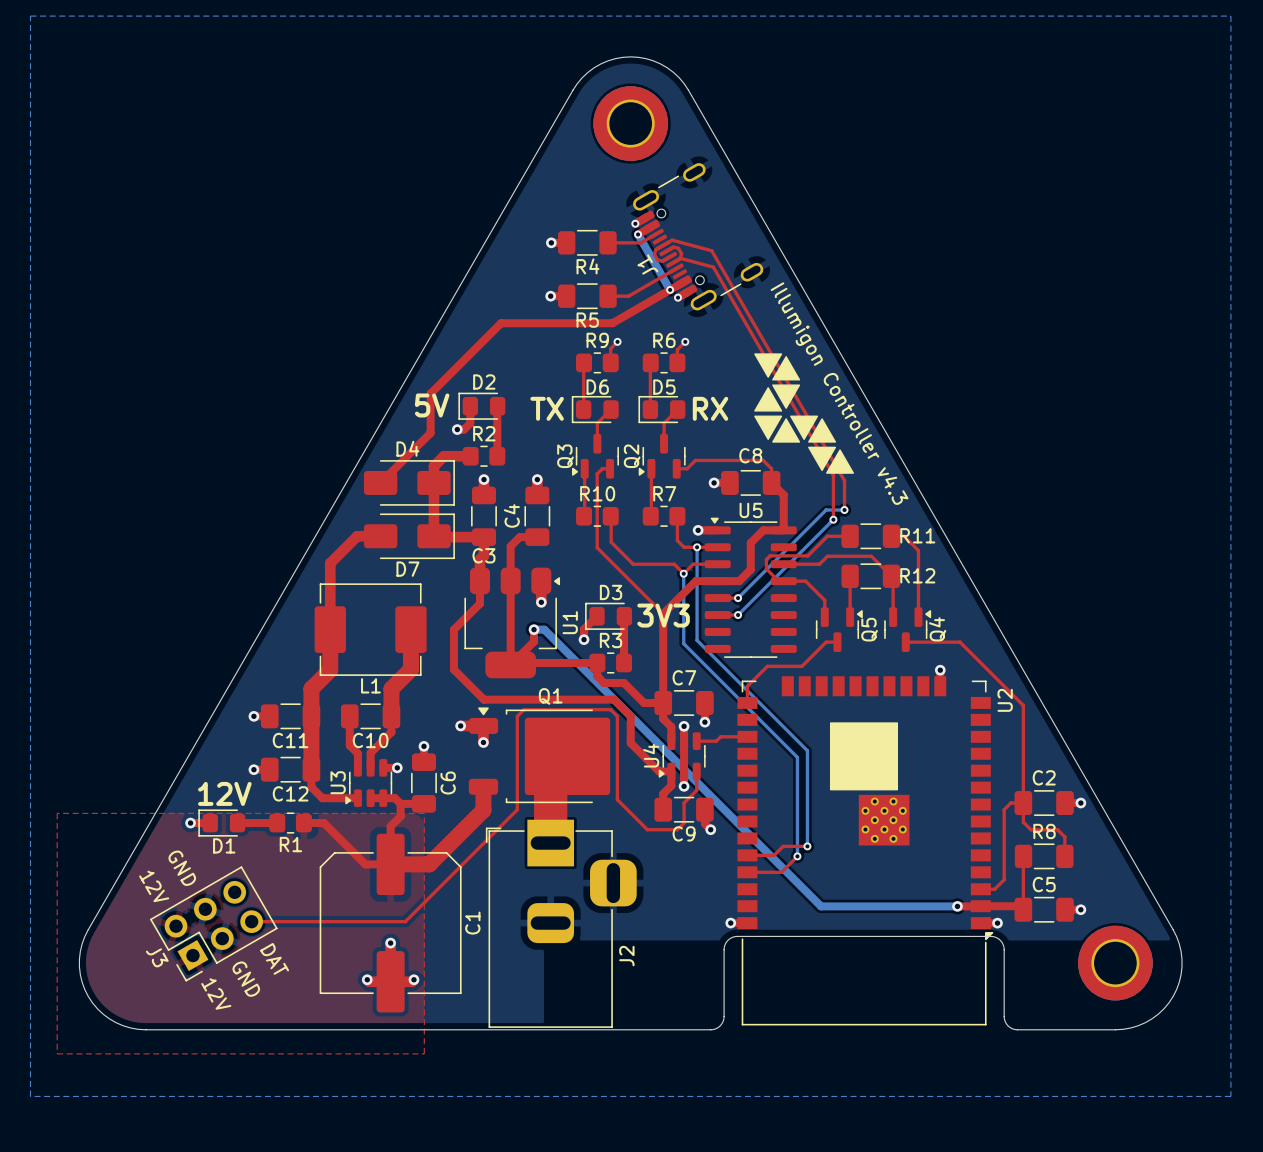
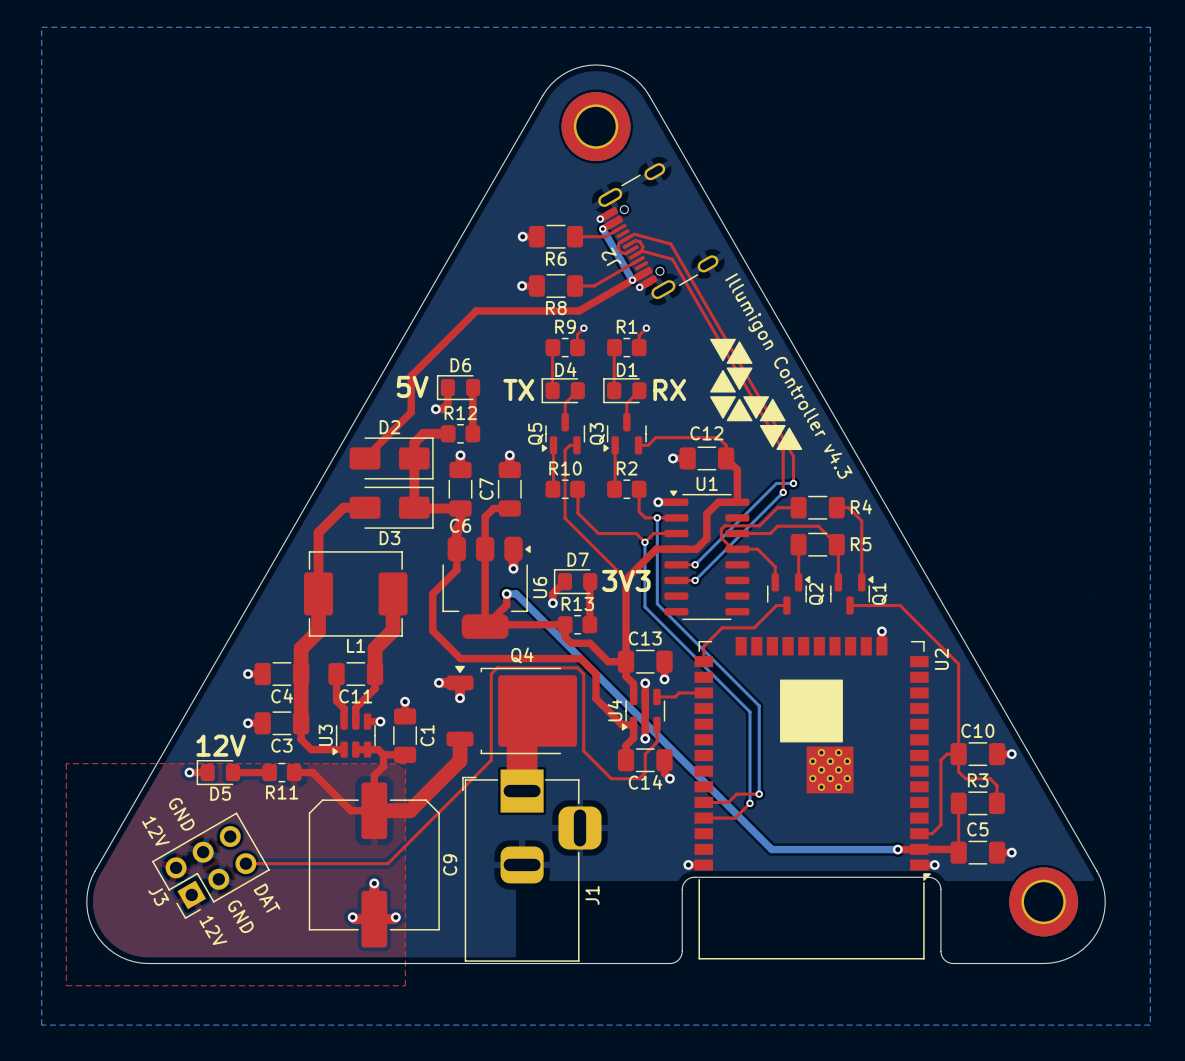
J1 name: J1 (647, 264) -> J2 (611, 256)
R4 name: R4 (588, 266) -> R6 (556, 258)
R5 name: R5 (587, 320) -> R8 (556, 308)
R6 name: R6 (664, 340) -> R1 (627, 326)
D2 name: D2 (484, 382) -> D6 (460, 365)
D6 name: D6 (597, 387) -> D4 (565, 369)
D5 name: D5 (664, 387) -> D1 (627, 369)
R2 name: R2 (484, 433) -> R12 (460, 413)
D4 name: D4 (407, 448) -> D2 (389, 427)
C8 name: C8 (750, 455) -> C12 (706, 433)
Q3 name: Q3 (565, 456) -> Q5 (535, 433)
Q2 name: Q2 (632, 456) -> Q3 (597, 433)
R7 name: R7 (664, 493) -> R2 (627, 468)
U5 name: U5 (751, 510) -> U1 (707, 483)
C4 name: C4 (511, 515) -> C7 (486, 488)
R11 name: R11 (917, 535) -> R4 (861, 506)
C3 name: C3 (483, 555) -> C6 (460, 525)
D7 name: D7 (407, 569) -> D3 (389, 538)
R12 name: R12 (917, 575) -> R5 (861, 544)
D3 name: D3 (611, 592) -> D7 (578, 559)
U1 name: U1 (570, 622) -> U6 (540, 587)
Q5 name: Q5 (869, 629) -> Q2 (816, 593)
Q4 name: Q4 (937, 629) -> Q1 (879, 593)
R3 name: R3 (611, 640) -> R13 (577, 603)
C7 name: C7 (684, 677) -> C13 (645, 638)
Q1 name: Q1 (550, 696) -> Q4 (522, 655)
C11 name: C11 (290, 740) -> C4 (282, 696)
C10 name: C10 (370, 740) -> C11 (355, 696)
C2 name: C2 (1044, 777) -> C10 (977, 730)
C6 name: C6 (448, 783) -> C1 (427, 735)
C12 name: C12 (290, 793) -> C3 (281, 745)
R8 name: R8 (1044, 831) -> R3 (978, 780)
C9 name: C9 (684, 833) -> C14 (645, 782)
R1 name: R1 (290, 844) -> R11 (282, 792)
D1 name: D1 (224, 845) -> D5 (220, 793)
C1 name: C1 (472, 923) -> C9 (450, 864)
J2 name: J2 (626, 956) -> J1 (592, 895)

